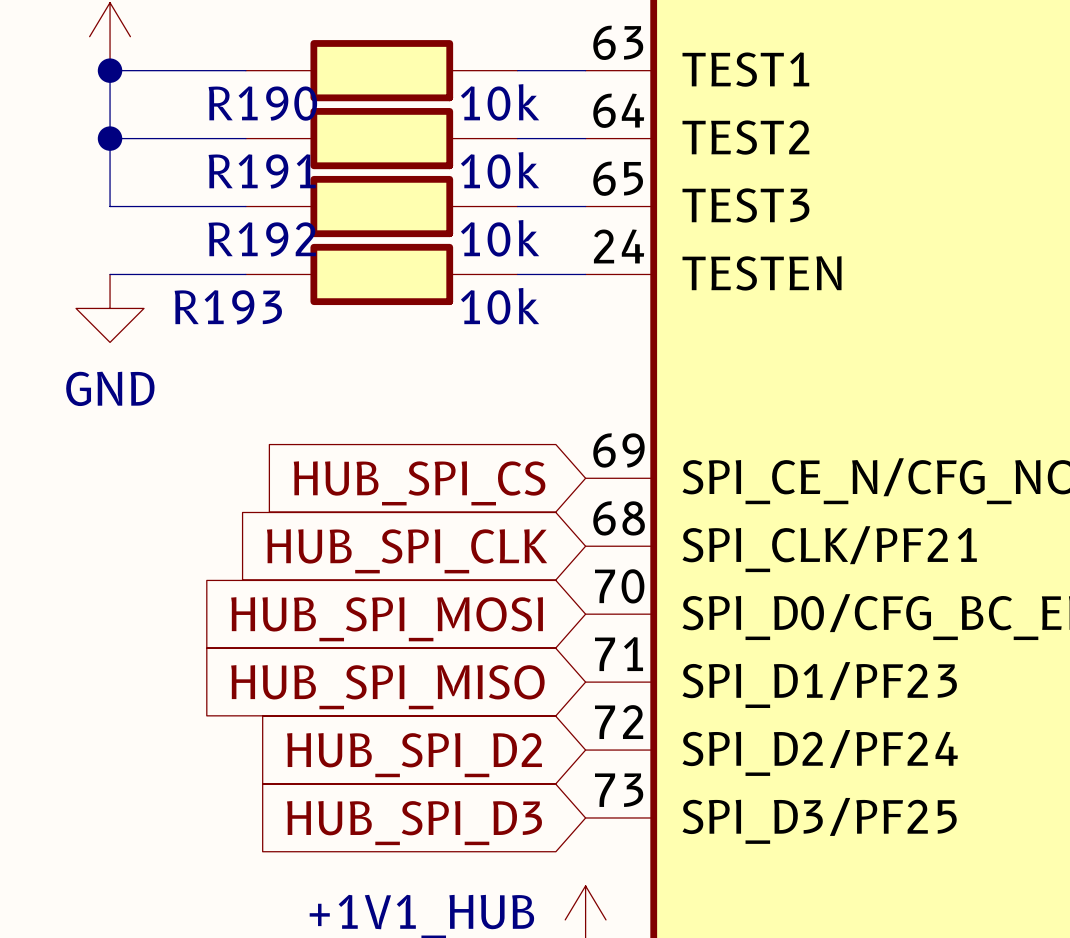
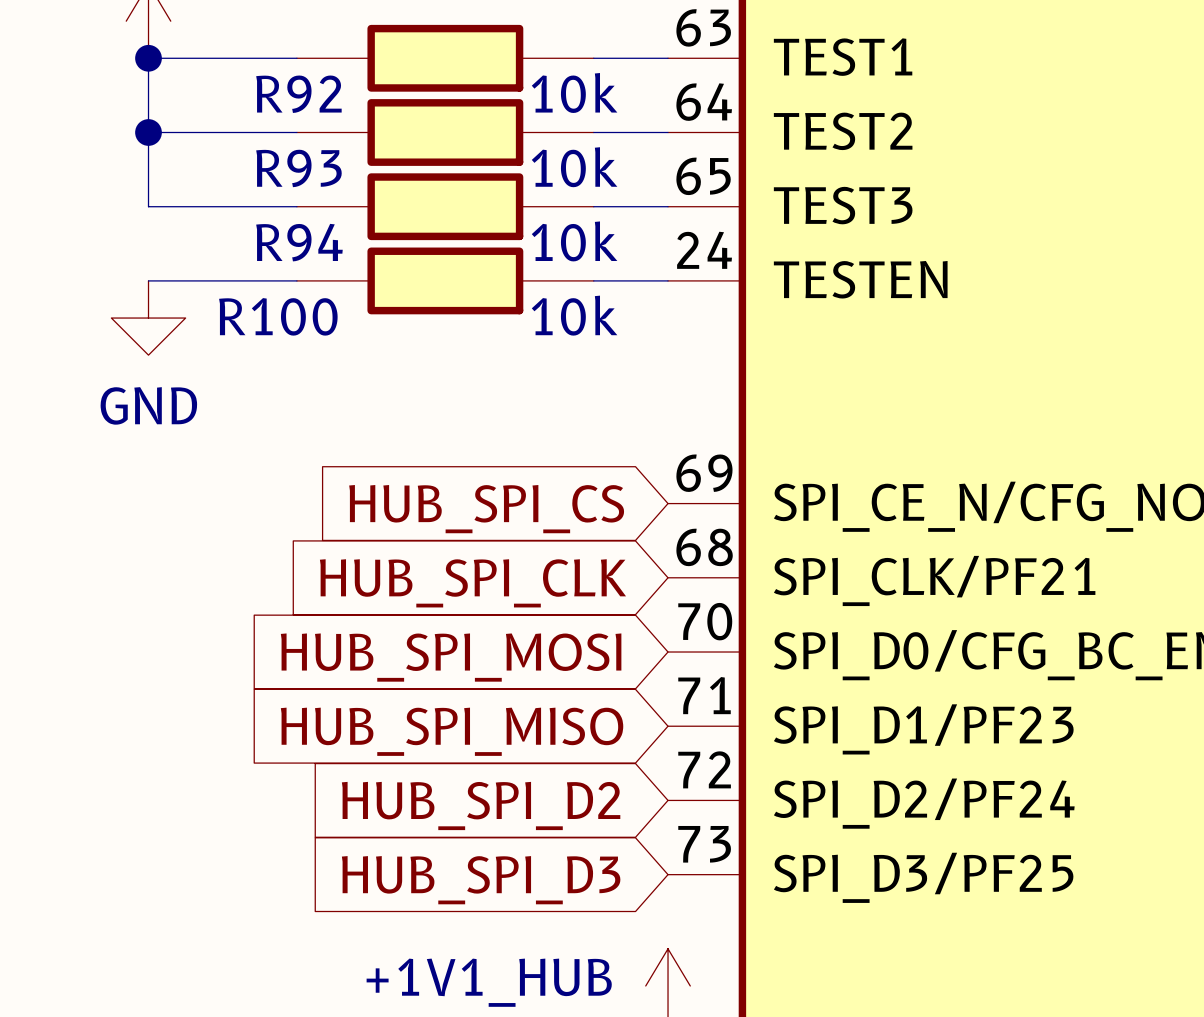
R190 name: R190 (262, 103) -> R92 (298, 94)
R191 name: R191 (262, 171) -> R93 (298, 168)
R192 name: R192 (262, 239) -> R94 (299, 242)
R193 name: R193 (228, 307) -> R100 (278, 316)

